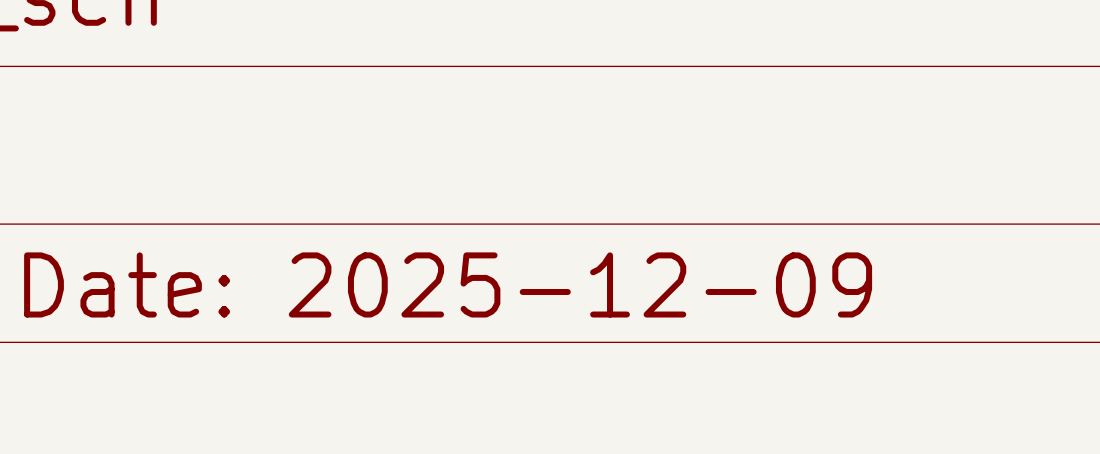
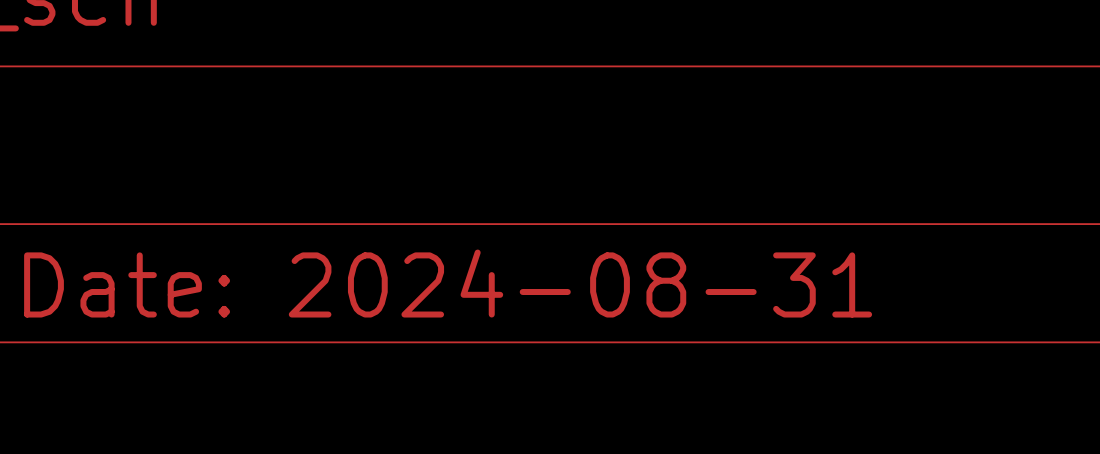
title block: Date: 2025-12-09 (448, 284) -> Date: 2024-08-31 (448, 283)

